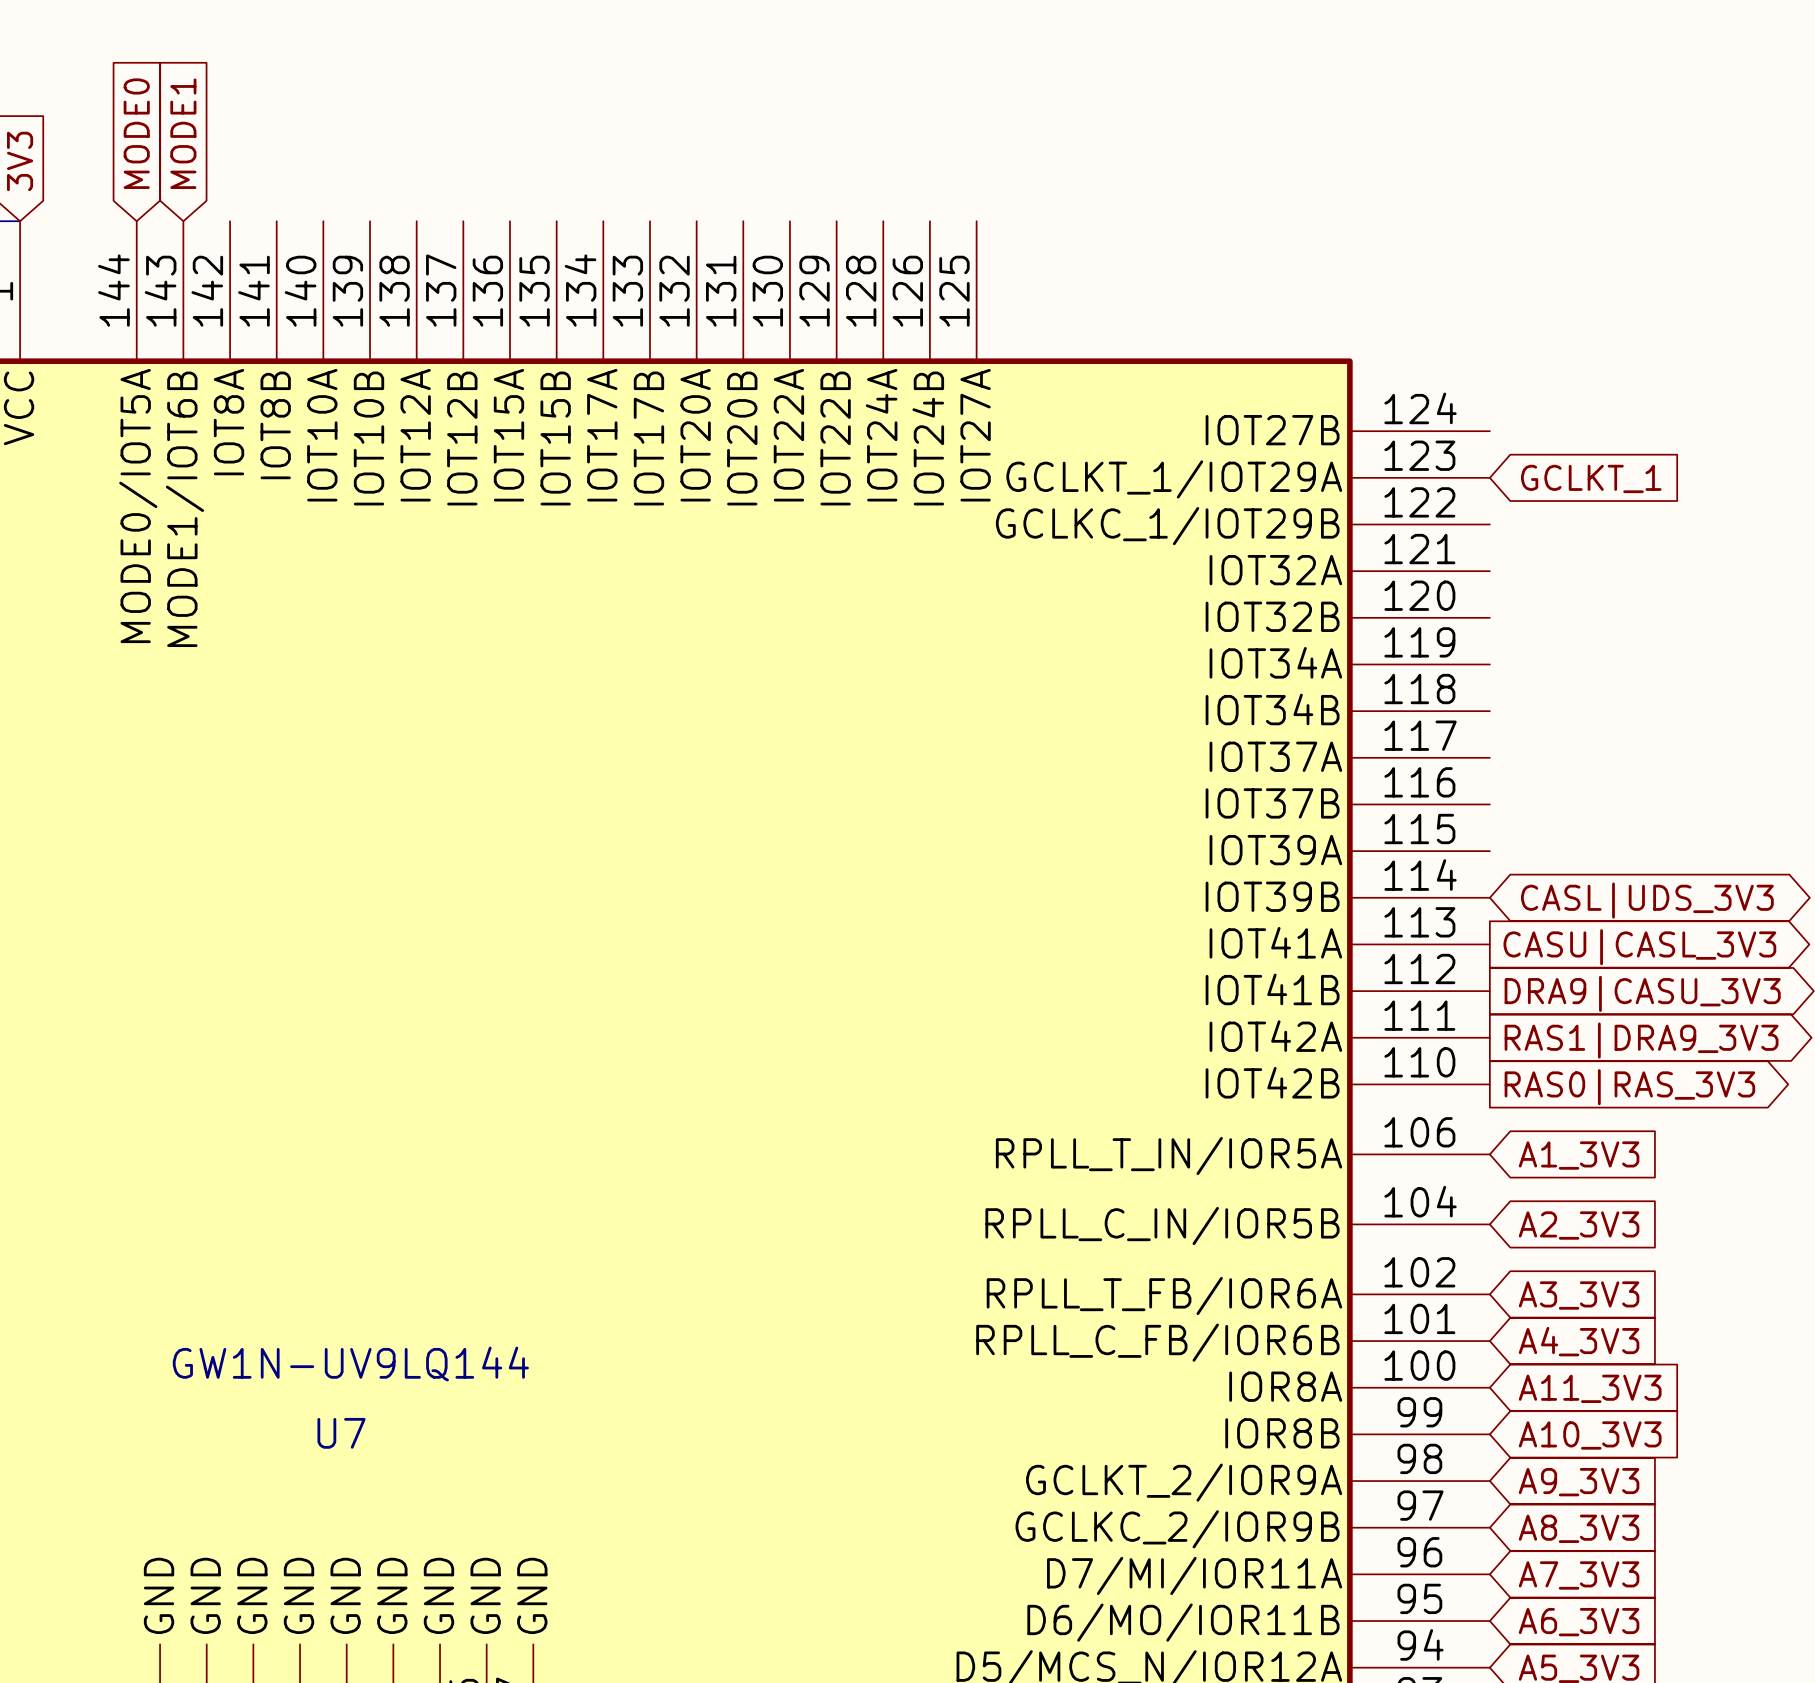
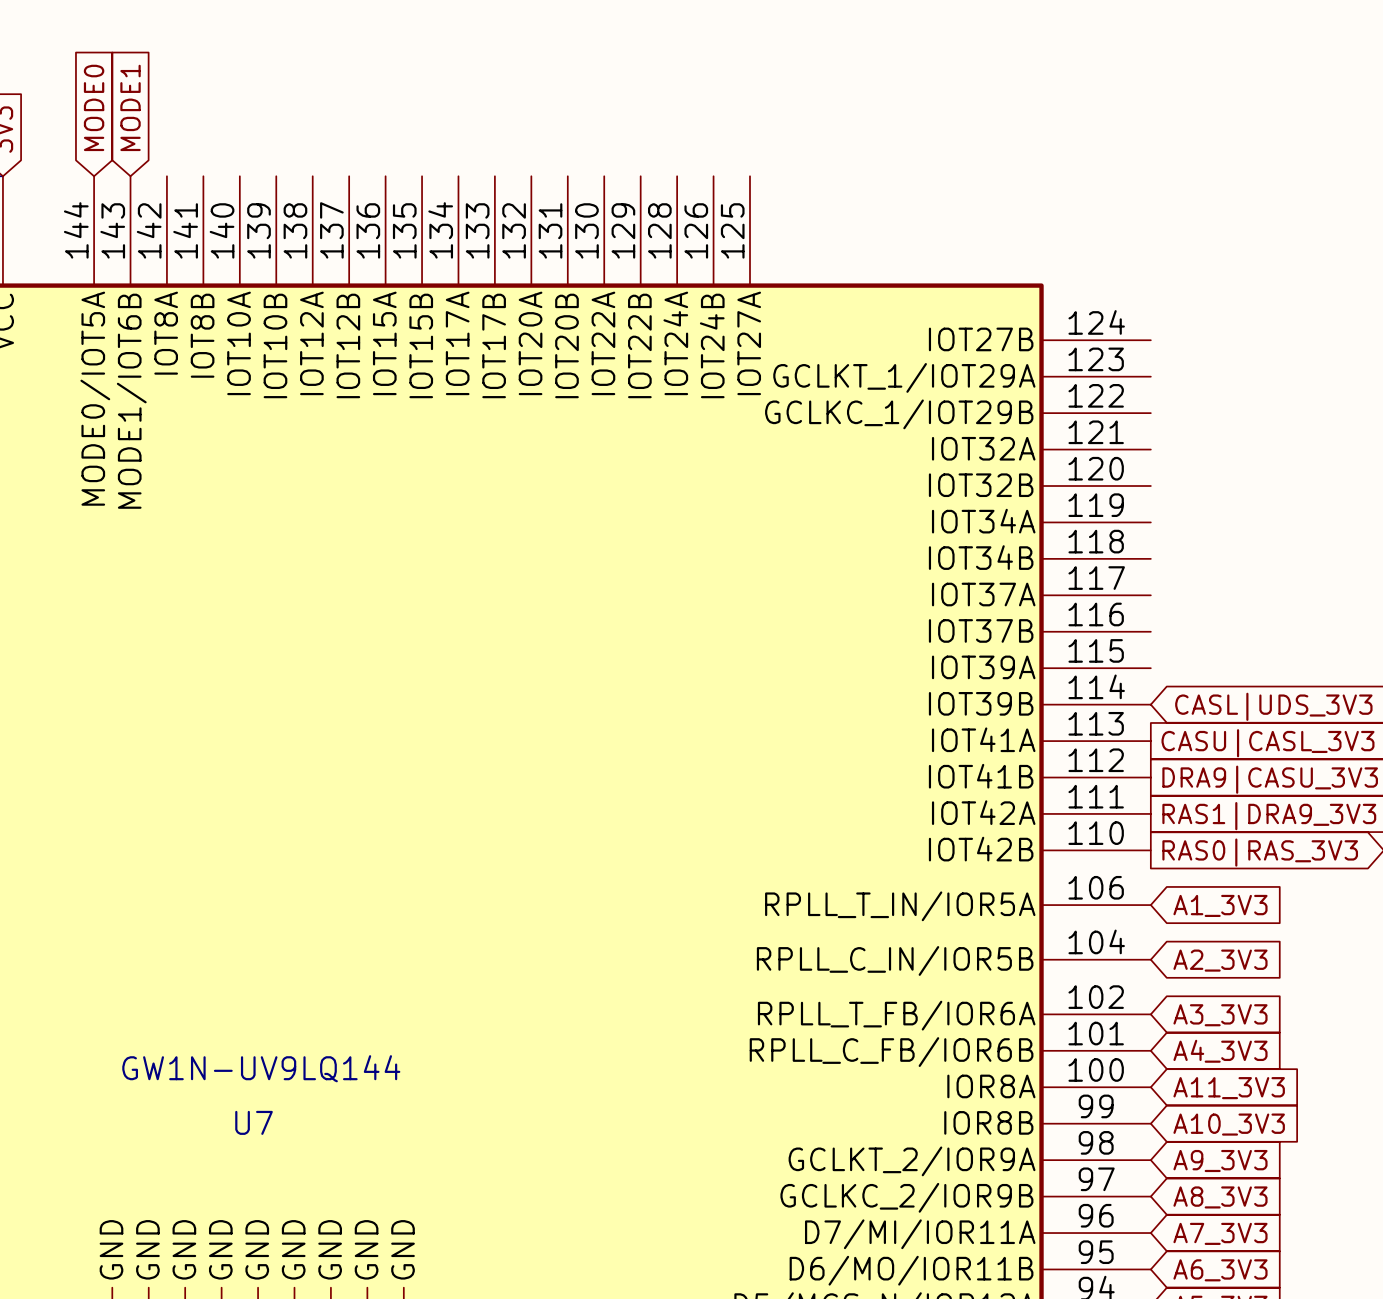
global label: GCLKT_1 (1591, 478) -> none

